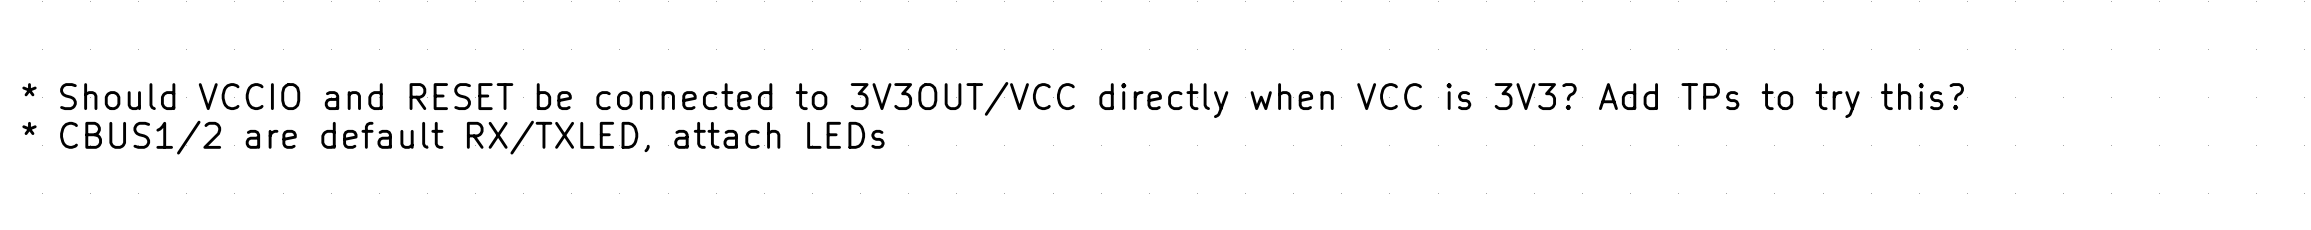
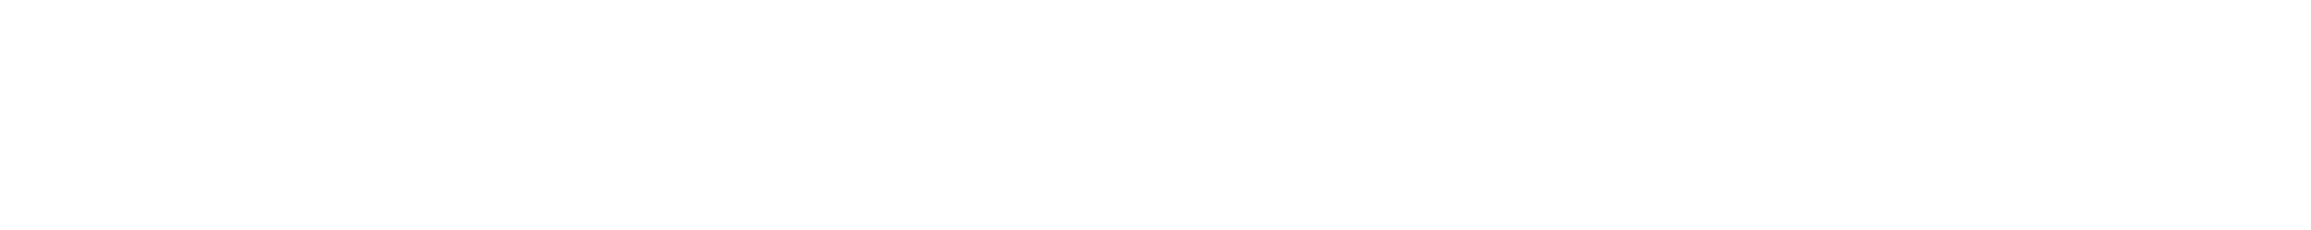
text: * Should VCCIO and RESET be connected to 3V3OUT/VCC directly when VCC is 3V3? Add TPs to try this? (993, 100) -> none
text: * CBUS1/2 are default RX/TXLED, attach LEDs (453, 137) -> none

